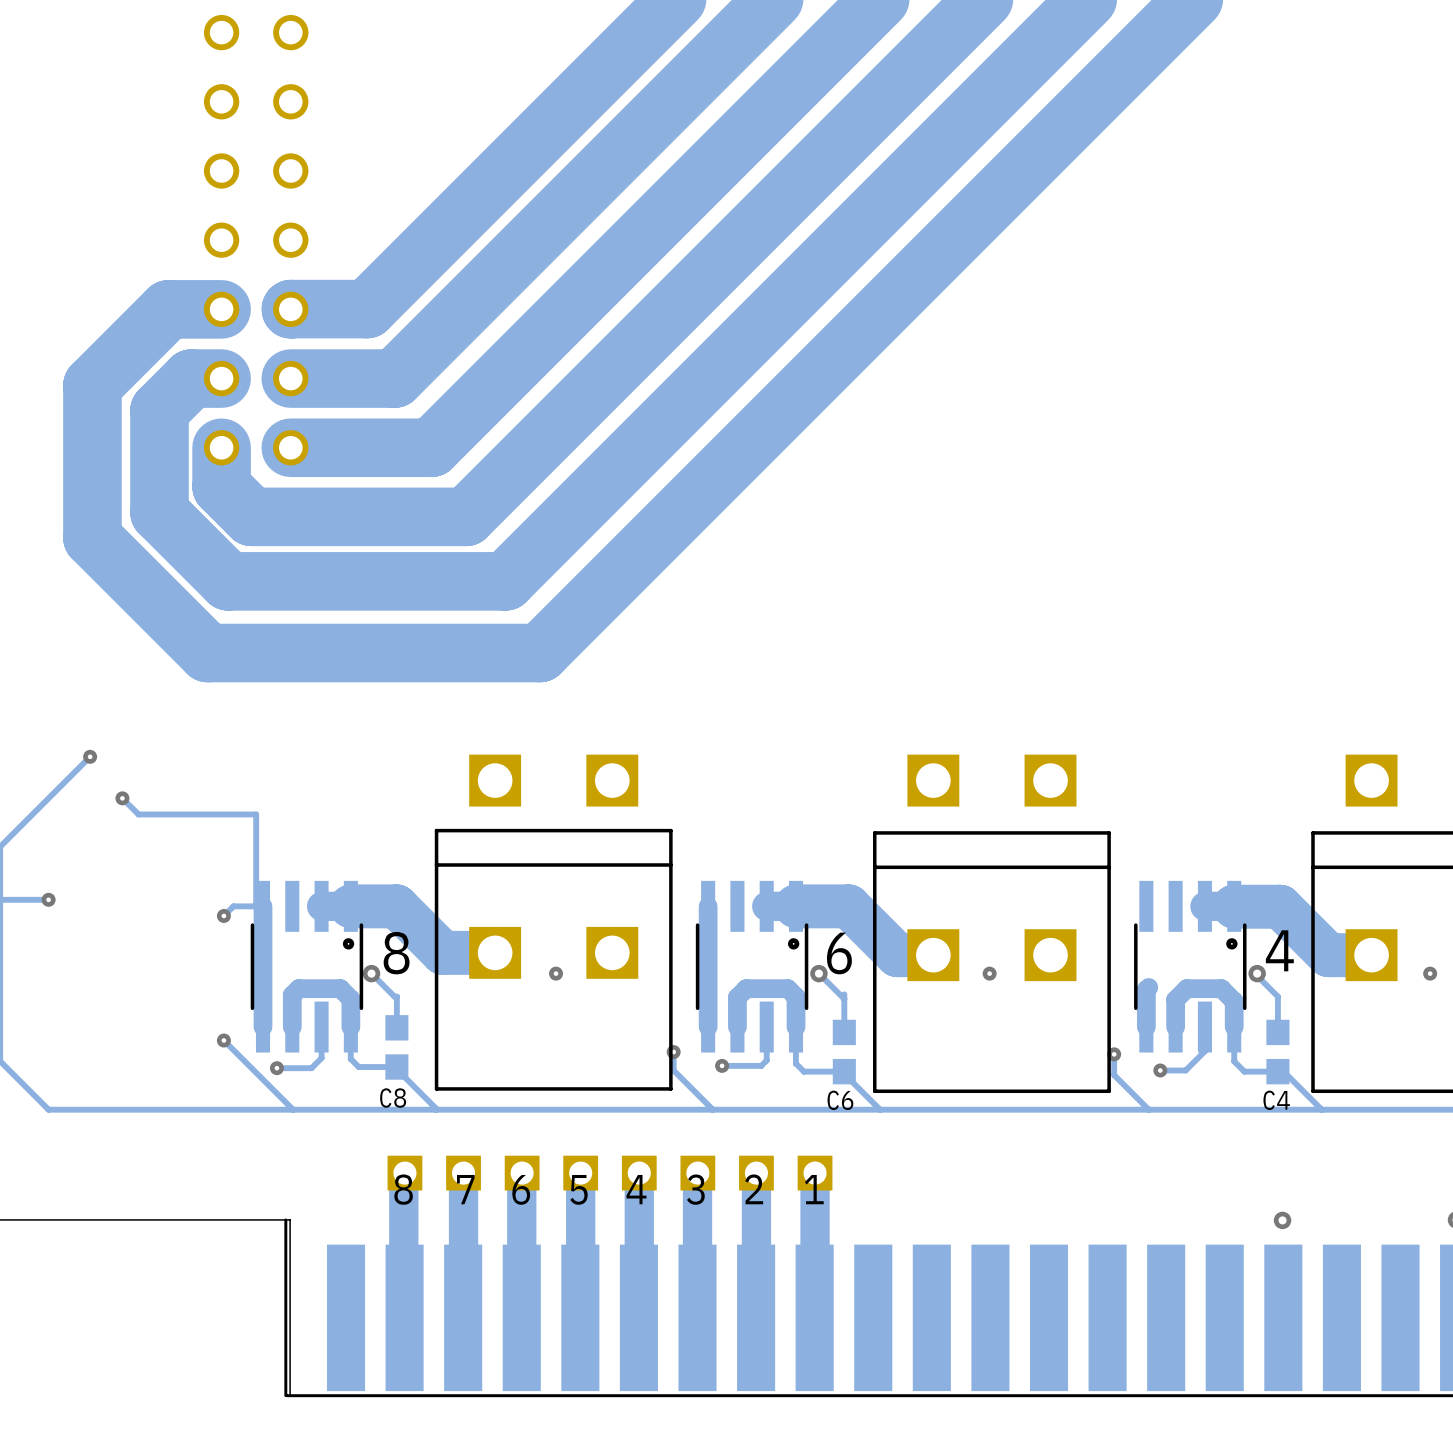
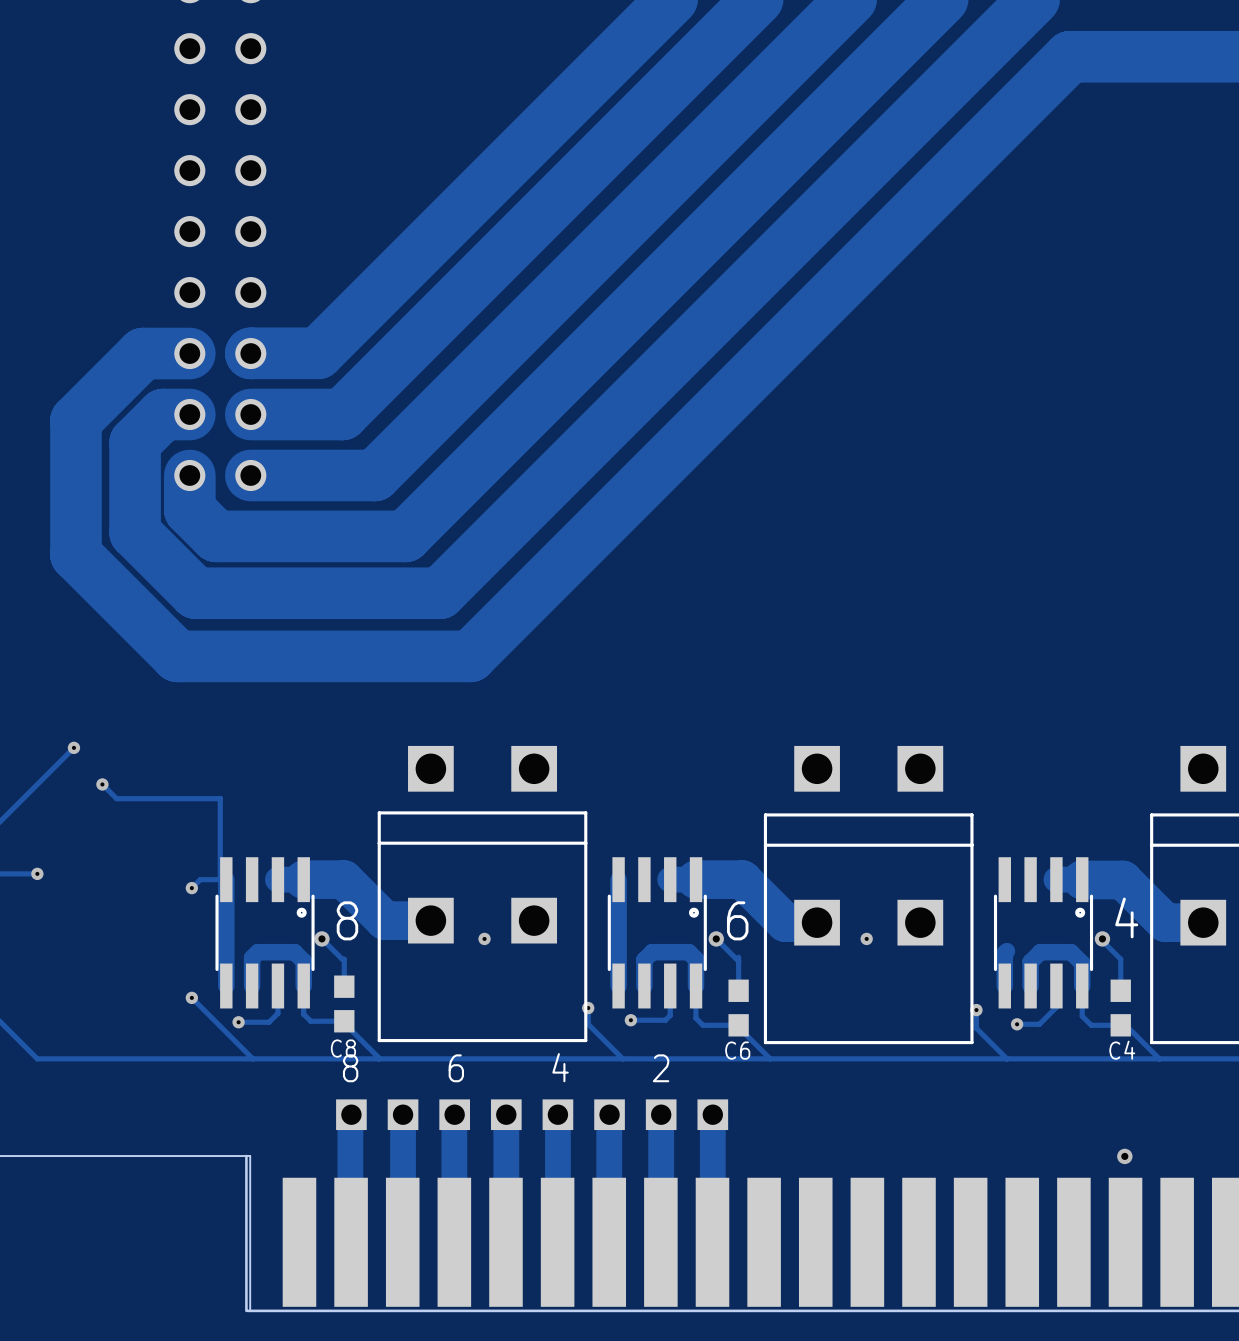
text position: 8 (403, 1189) -> 8 (350, 1068)
text: 7 (465, 1189) -> none
text position: 6 (521, 1189) -> 6 (456, 1068)
text: 5 (579, 1189) -> none
text position: 4 (636, 1189) -> 4 (560, 1067)
text: 3 (695, 1189) -> none
text position: 2 (754, 1189) -> 2 (661, 1068)
text: 1 (814, 1189) -> none

